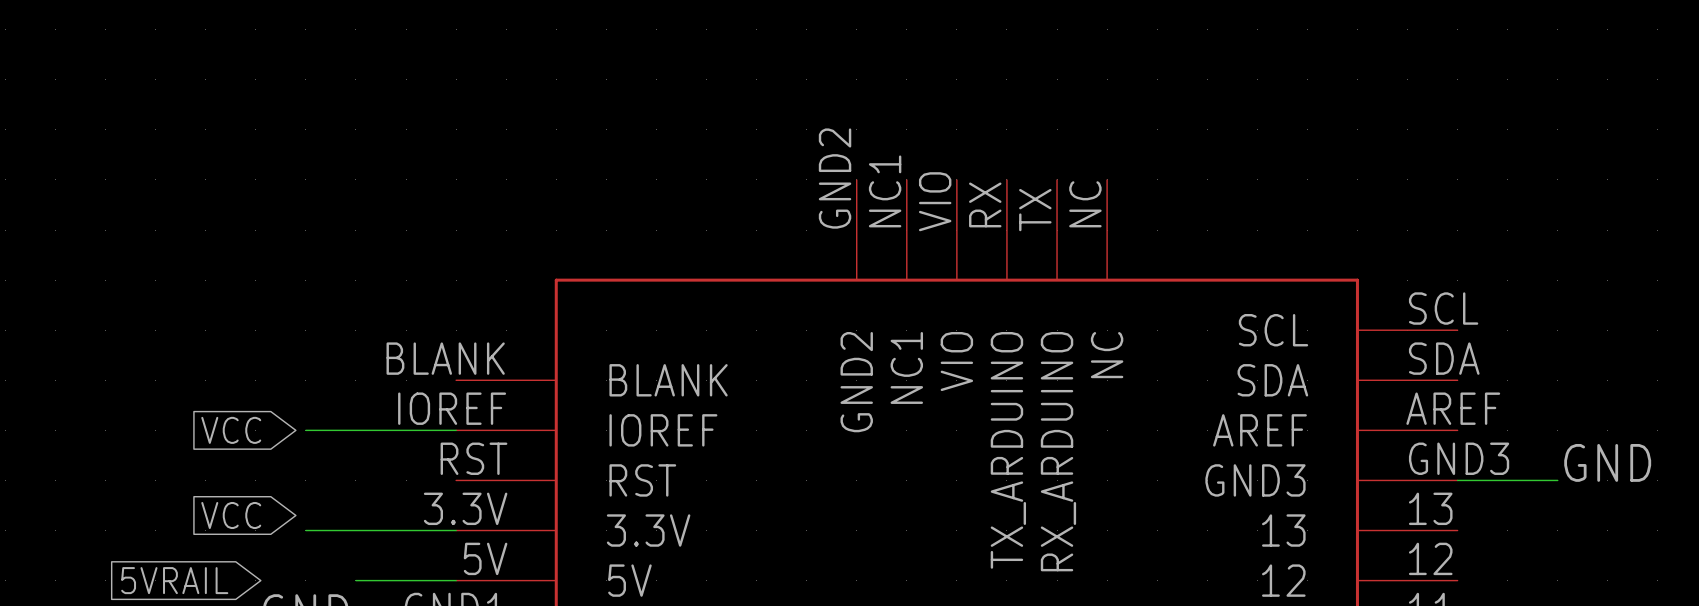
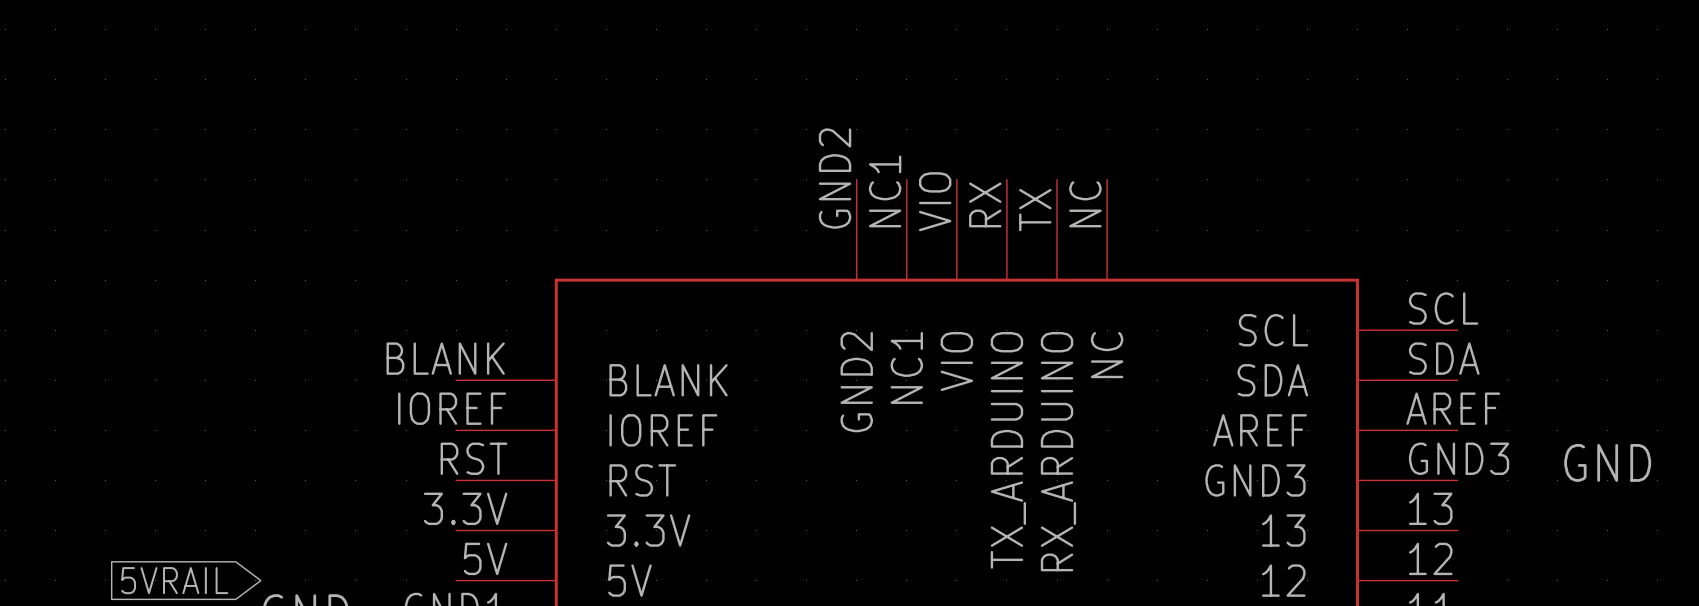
global label: VCC (231, 430) -> none
wire: (305, 430) (456, 430) -> none
wire: (1457, 480) (1557, 480) -> none
global label: VCC (231, 515) -> none
wire: (305, 530) (456, 530) -> none
wire: (355, 580) (456, 580) -> none

